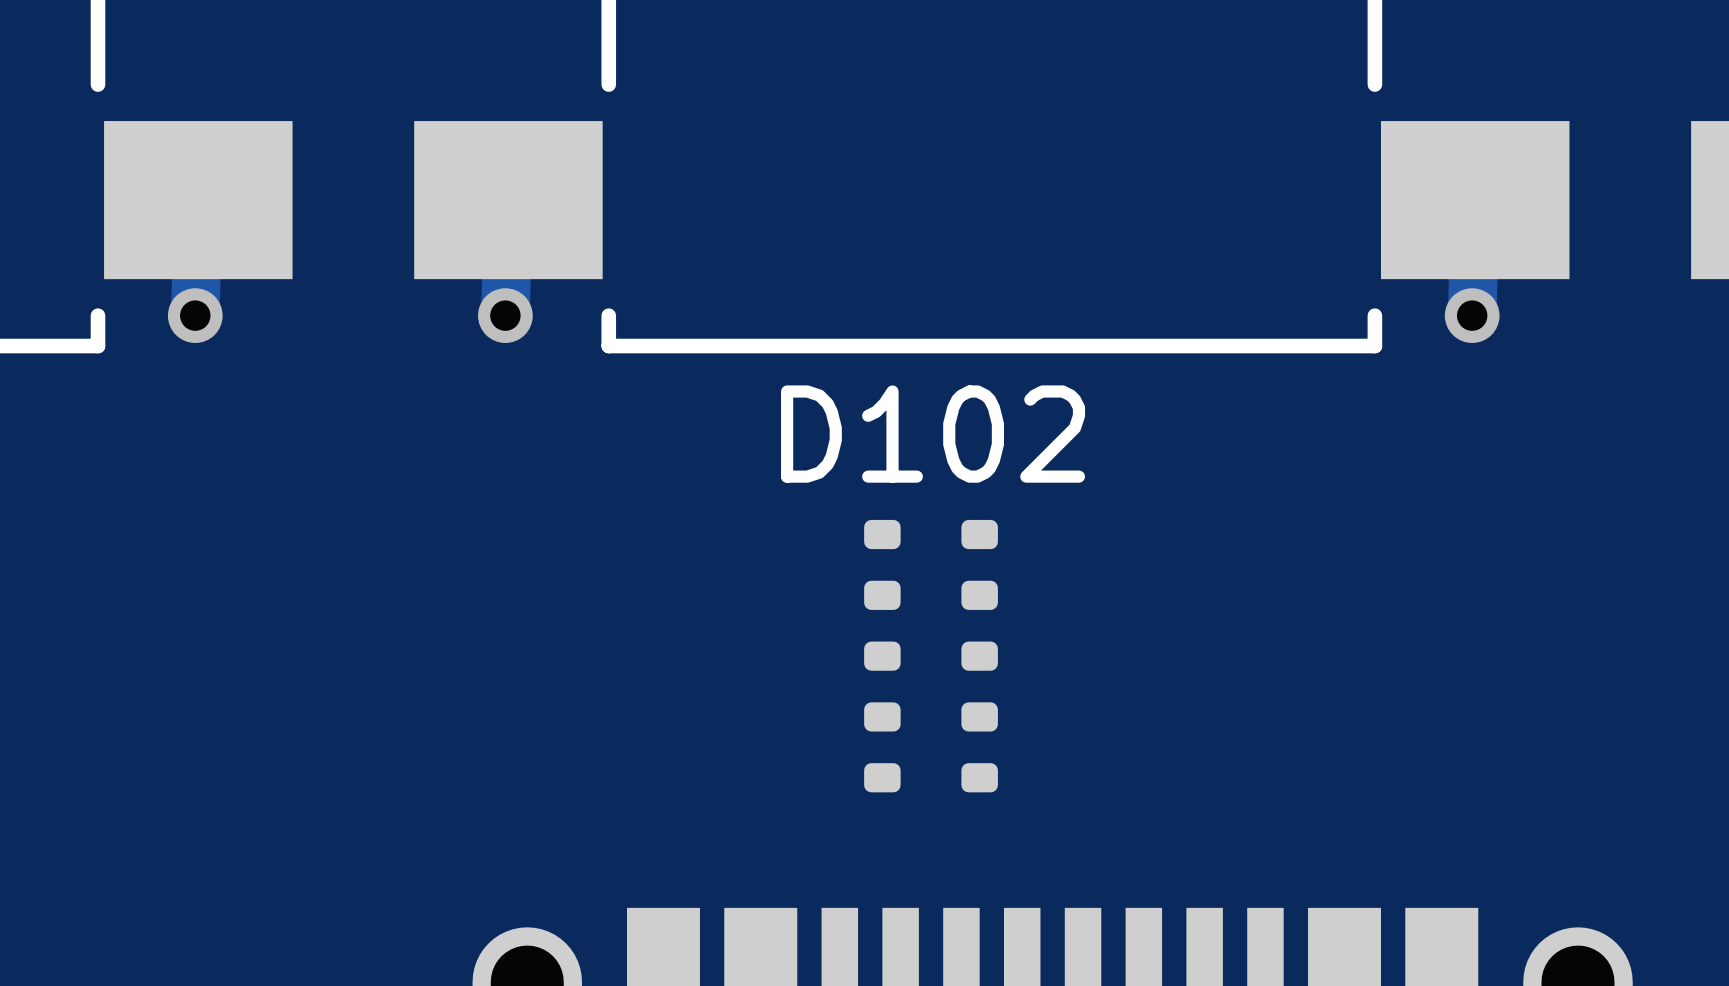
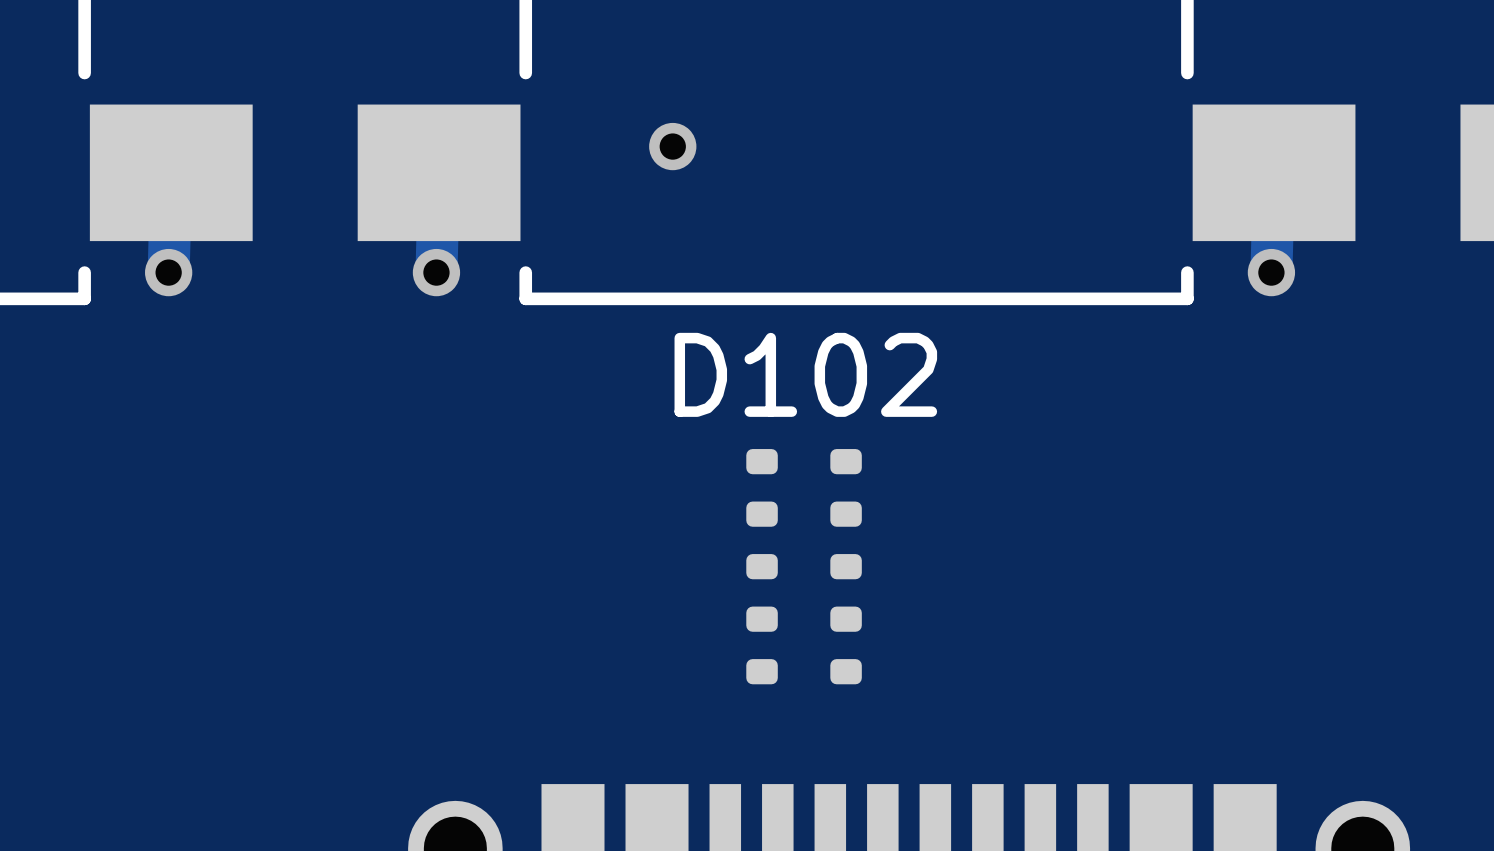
via: none -> (672, 146)

